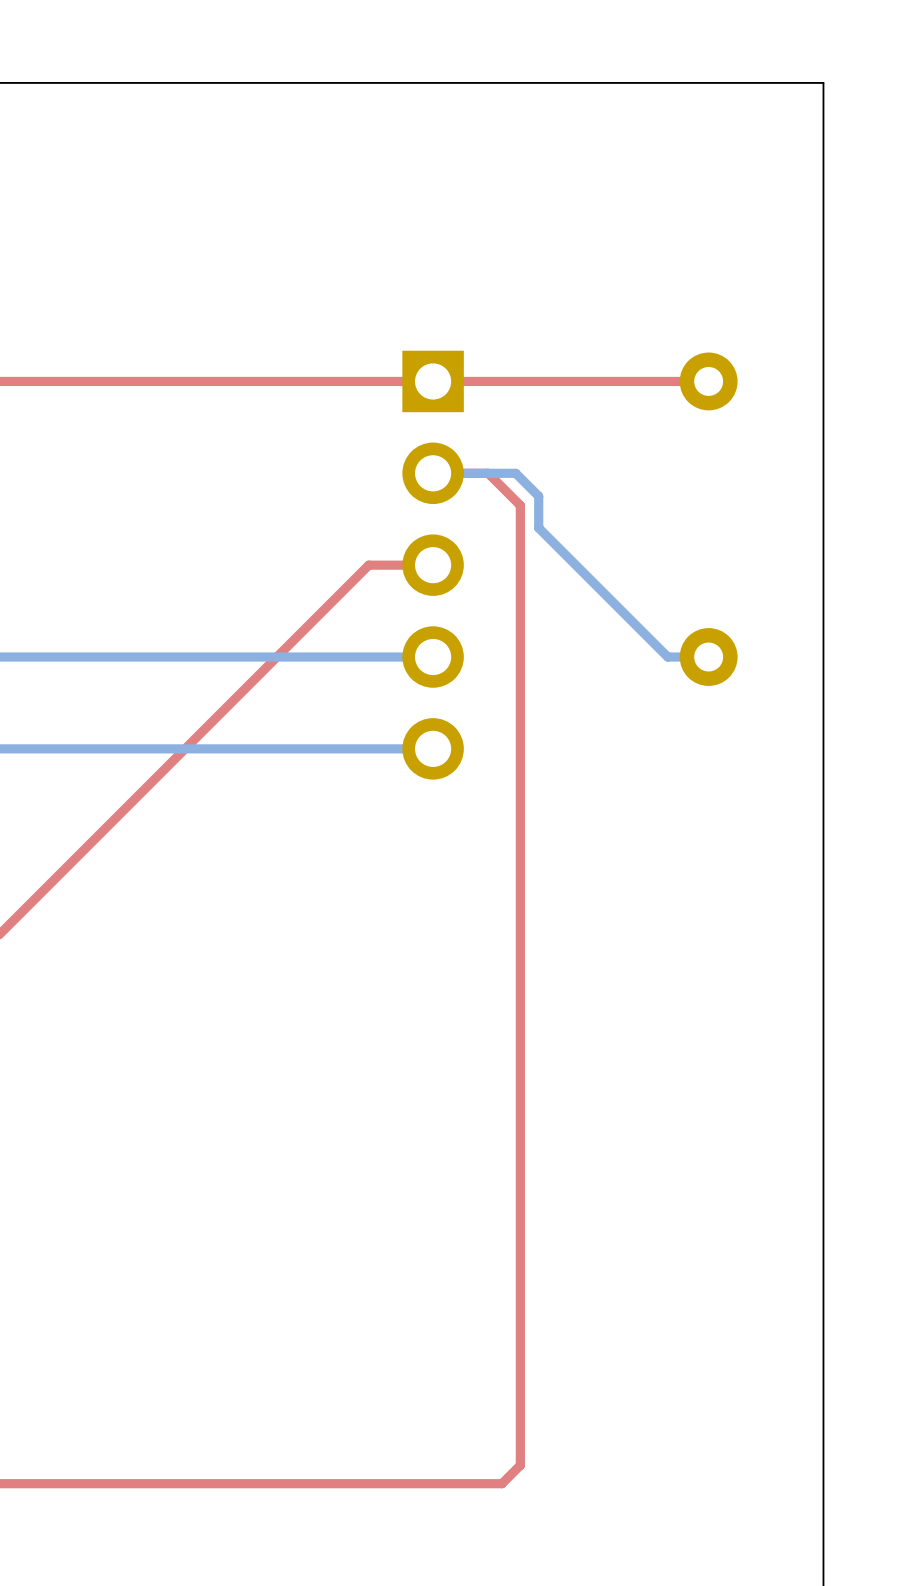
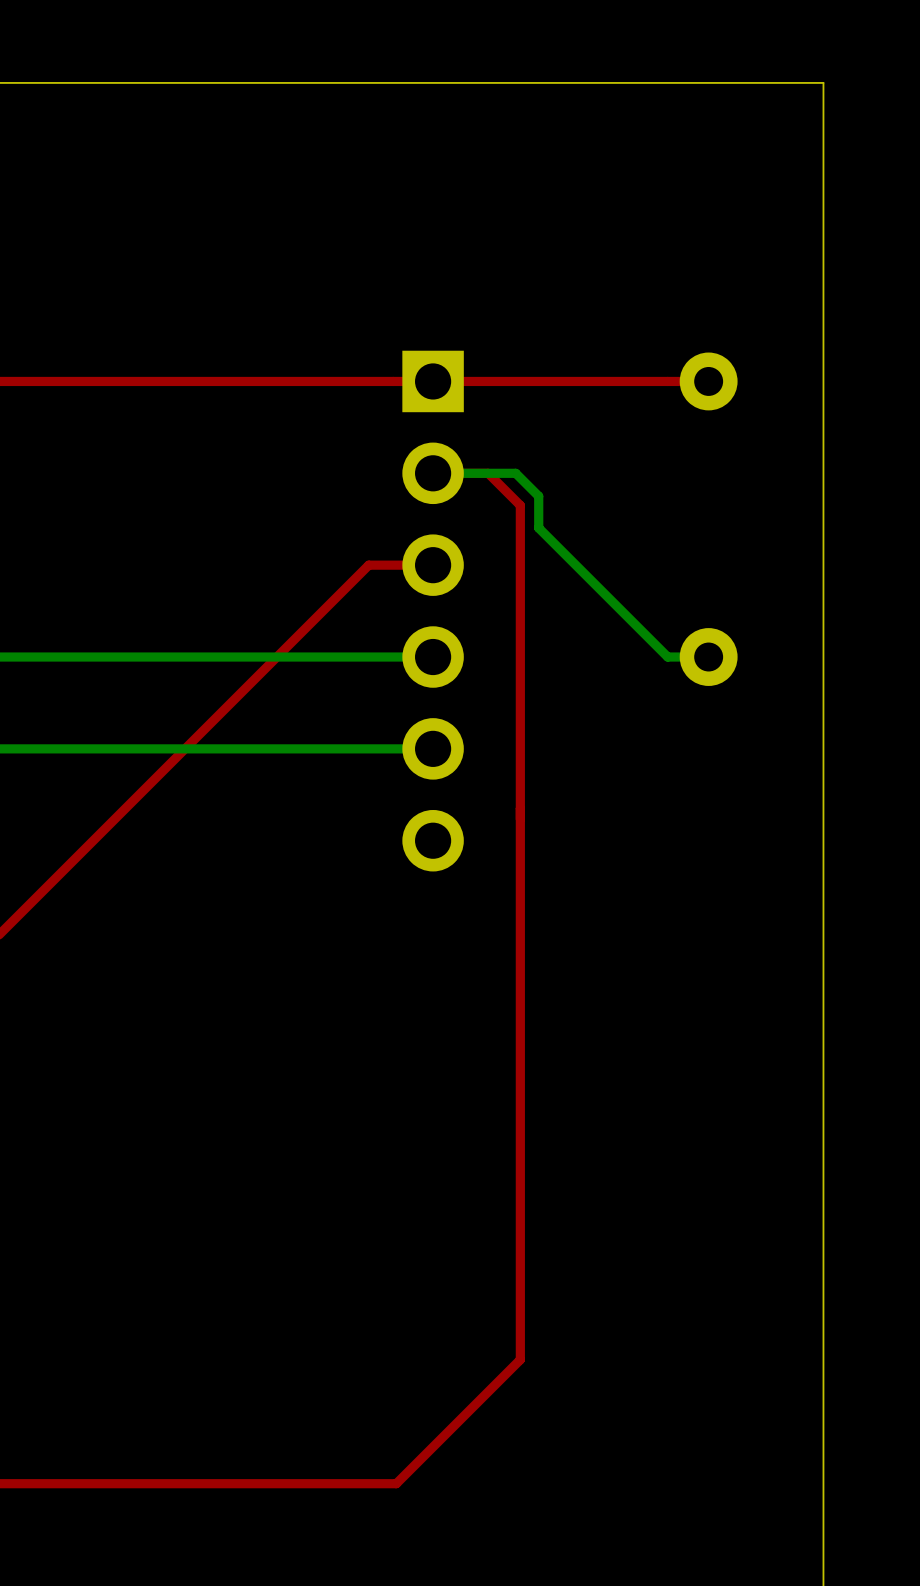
part: none -> (433, 611)
top track: (520, 1359) (520, 1465) (501, 1483) (396, 1483) -> (520, 1359) (396, 1483)

